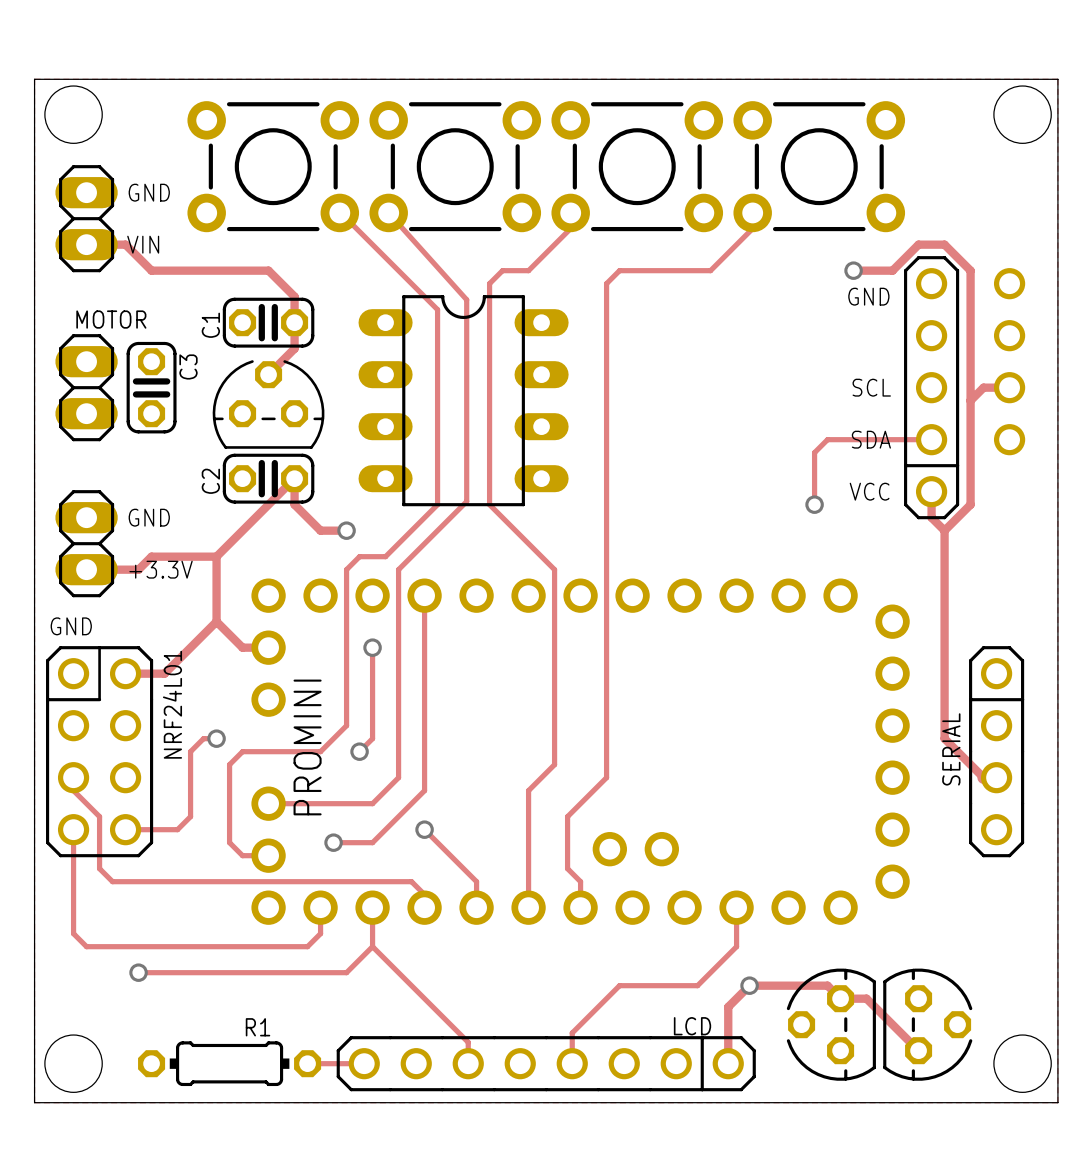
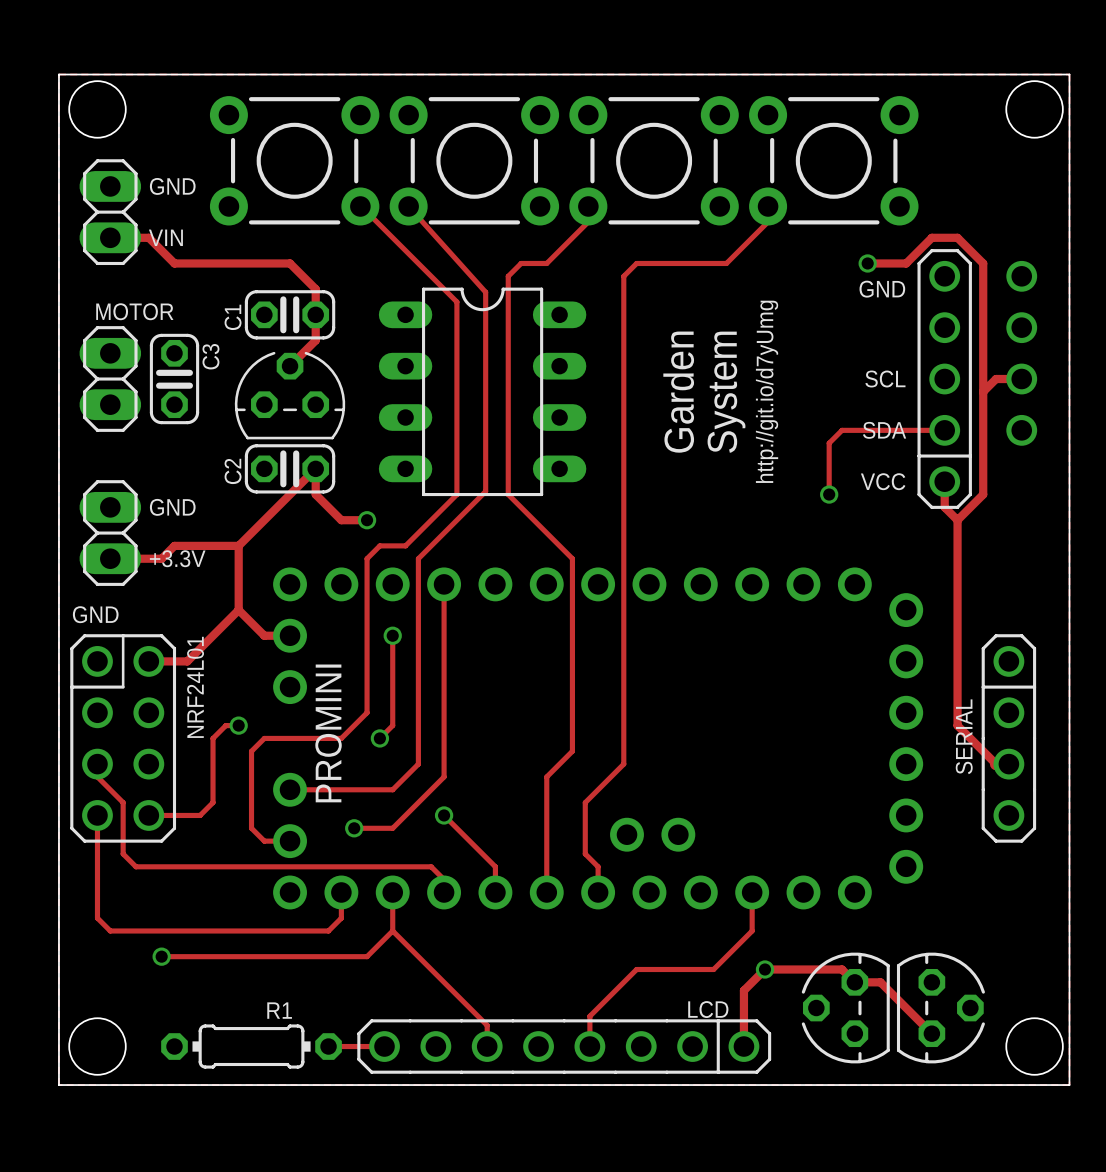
text: none -> http://git.io/d7yUmg (767, 391)
text: none -> Garden (678, 392)
text: none -> System (726, 392)

